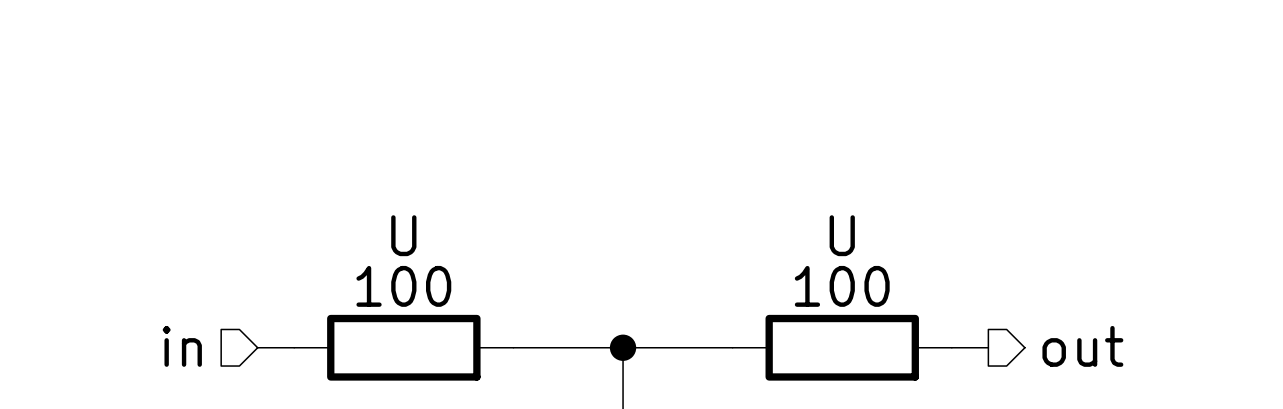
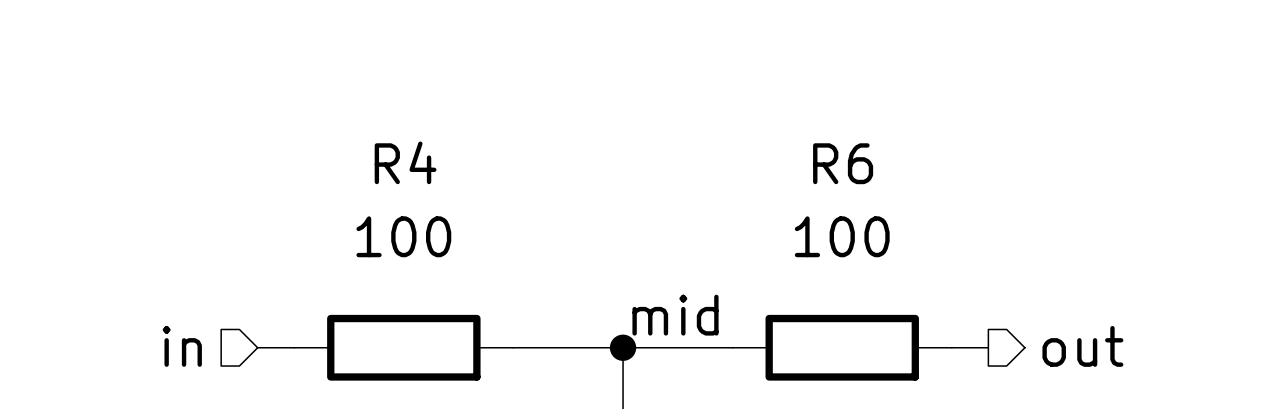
U name: U (403, 235) -> R4 (405, 162)
U name: U (842, 235) -> R6 (843, 163)
U value position: 100 (403, 286) -> 100 (403, 236)
U value position: 100 (842, 286) -> 100 (842, 236)
label: none -> mid (675, 315)

